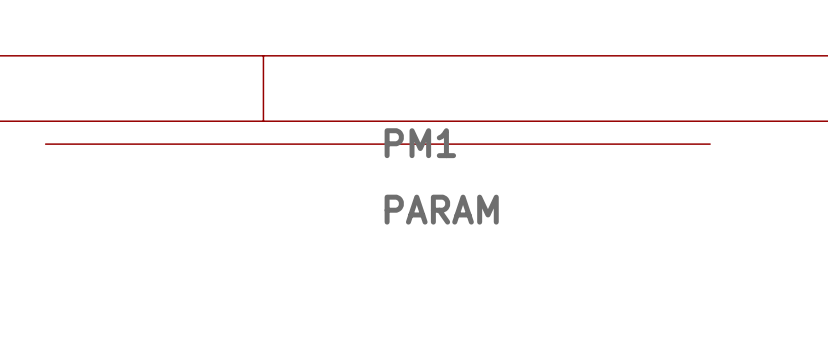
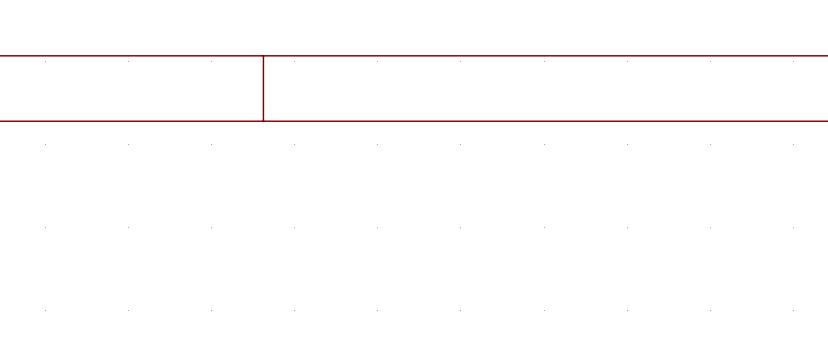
PM1: PARAM (377, 144) -> none

